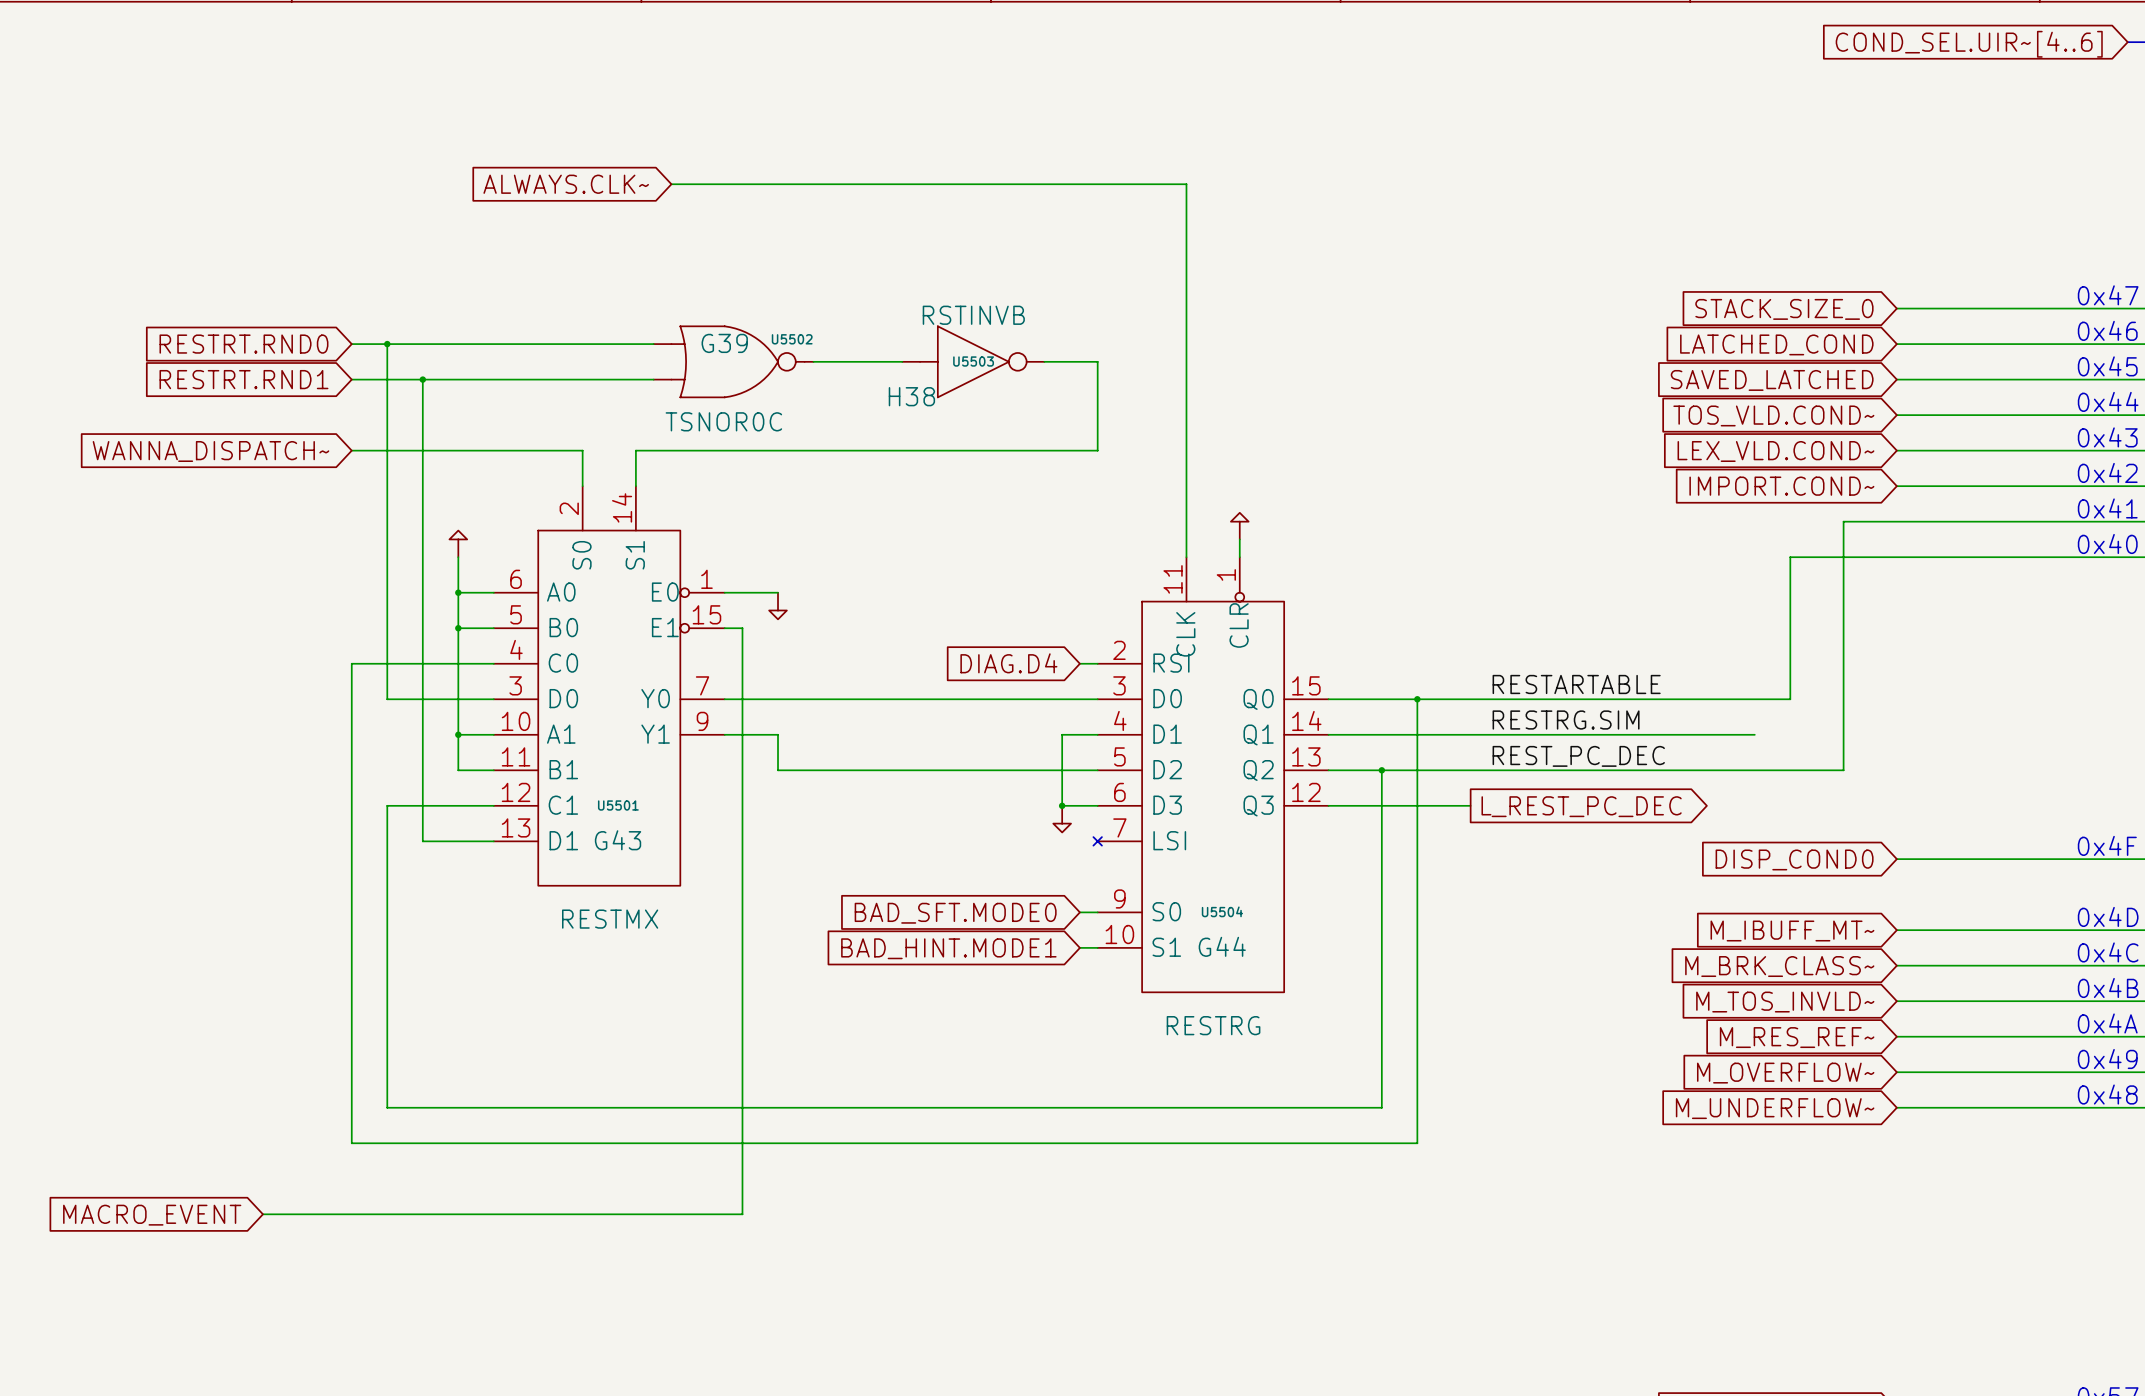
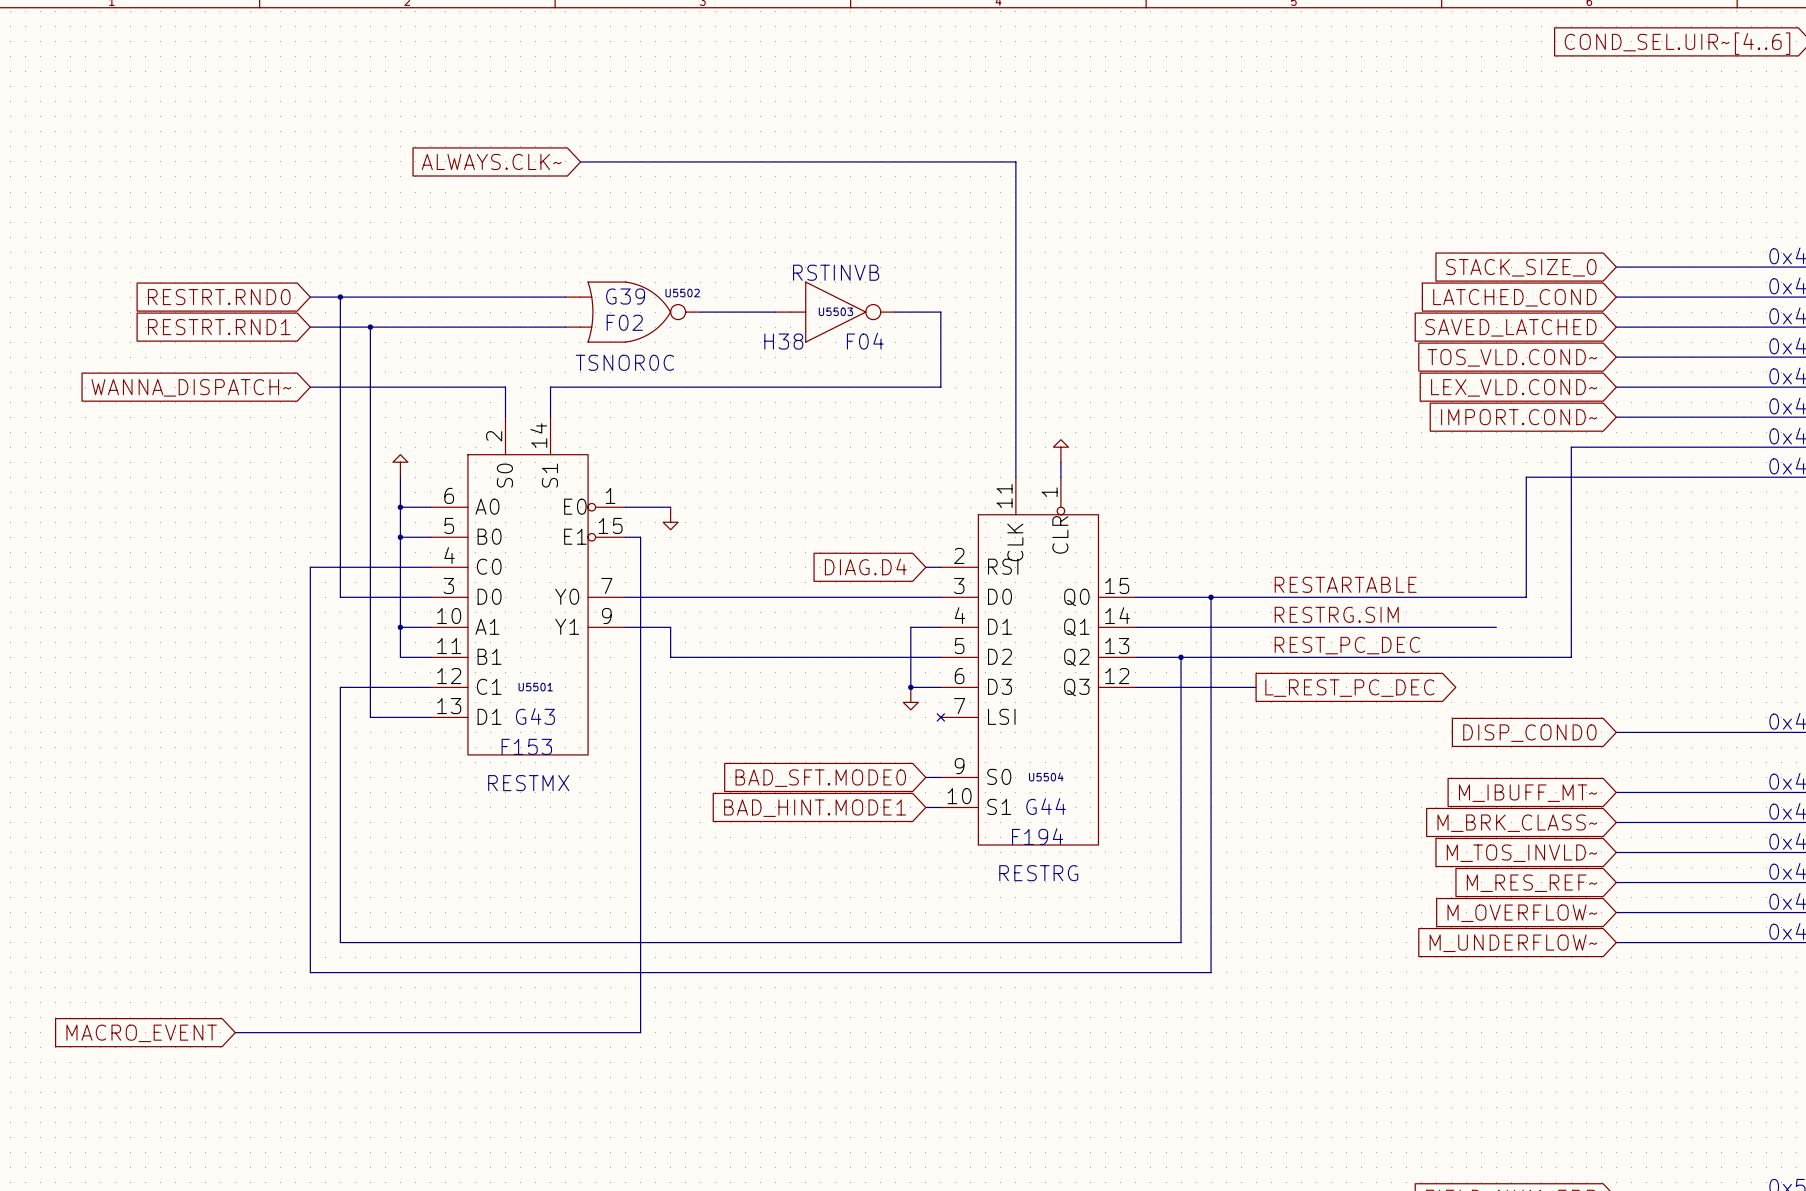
U5502 value: none -> F02 (624, 322)
U5503 value: none -> F04 (865, 341)
U5501 value: none -> F153 (526, 746)
U5504 value: none -> F194 (1037, 836)

